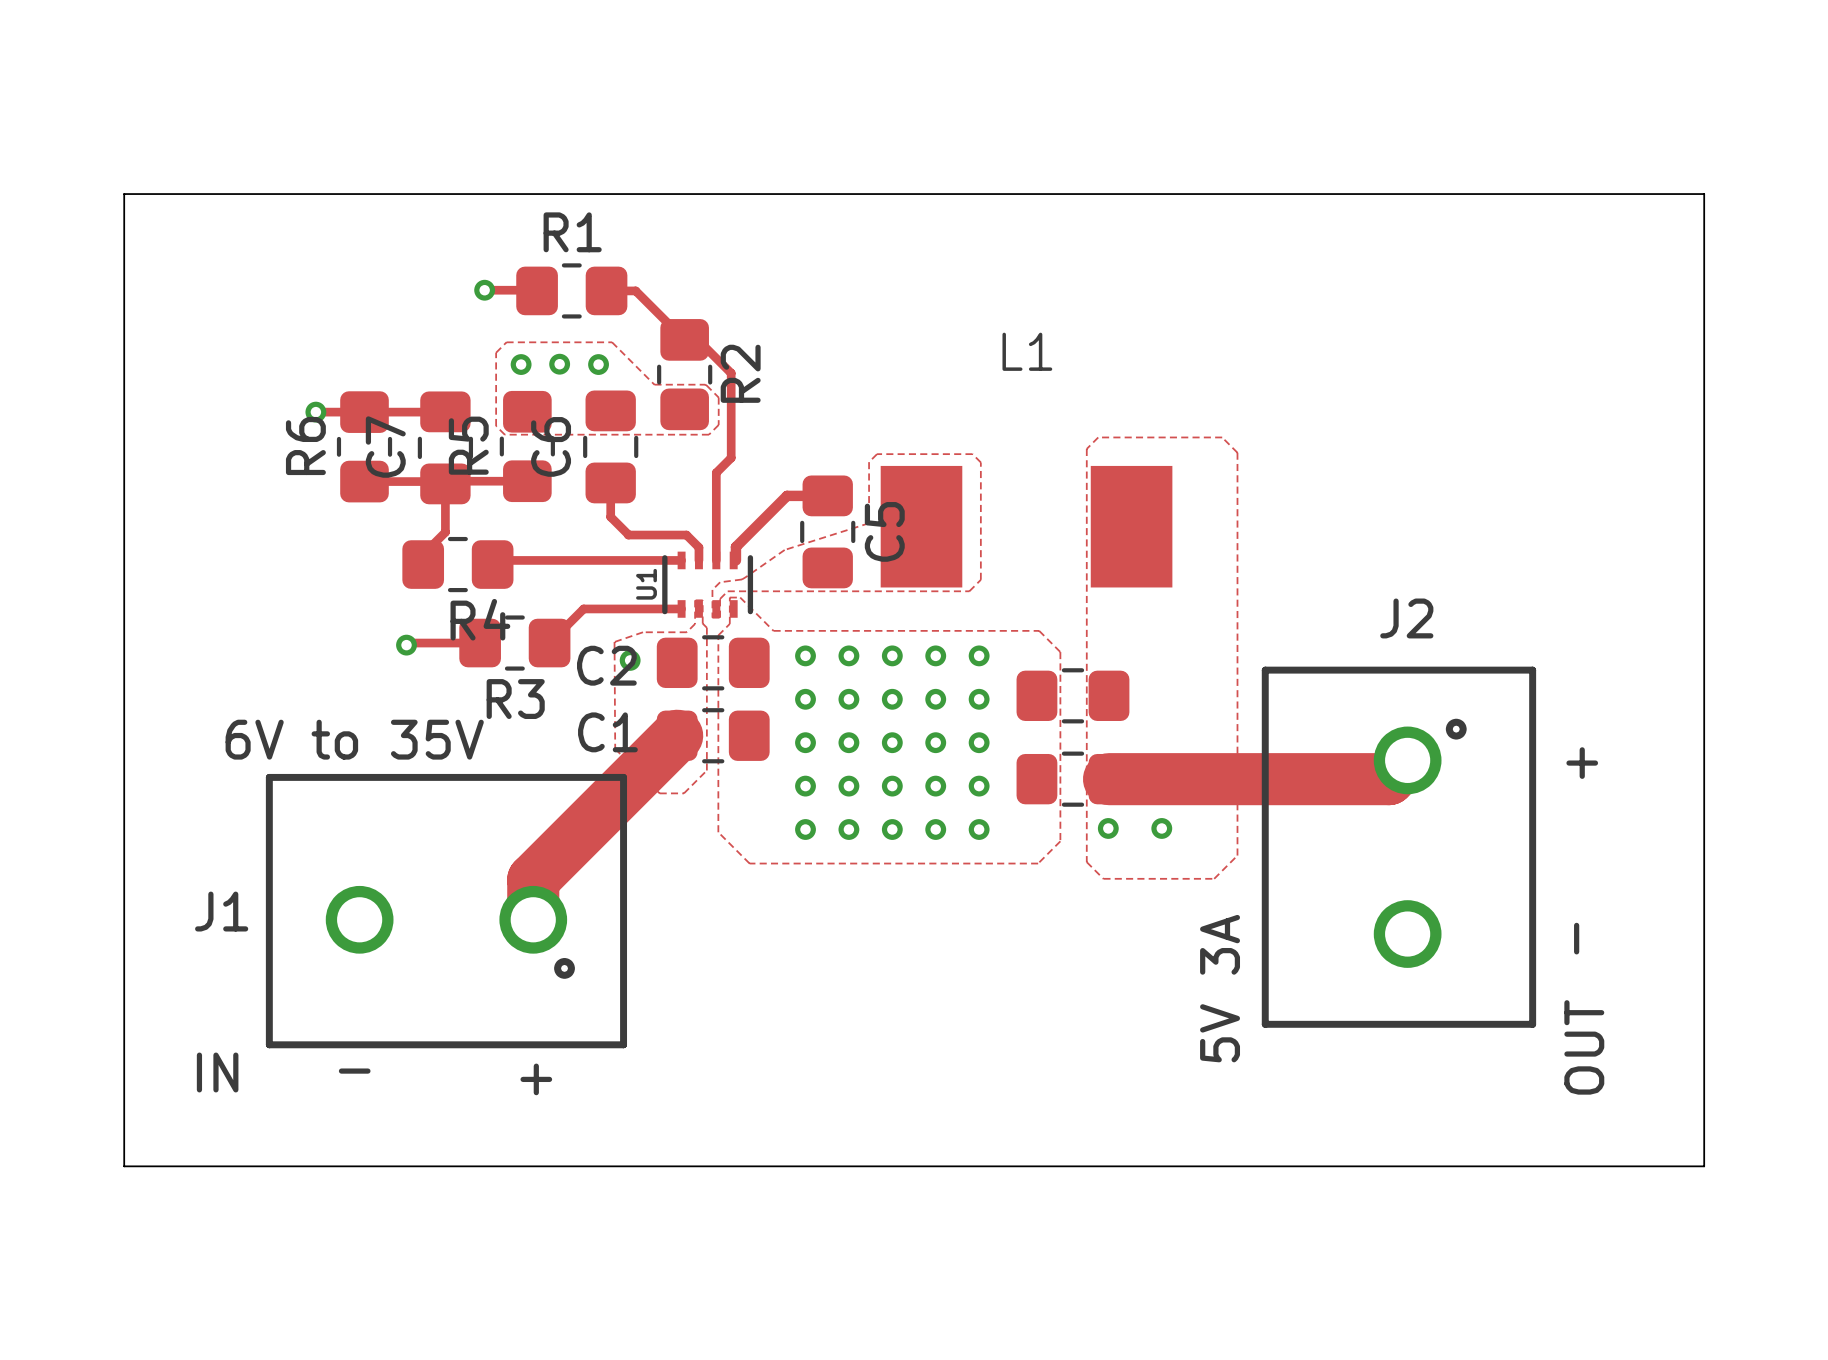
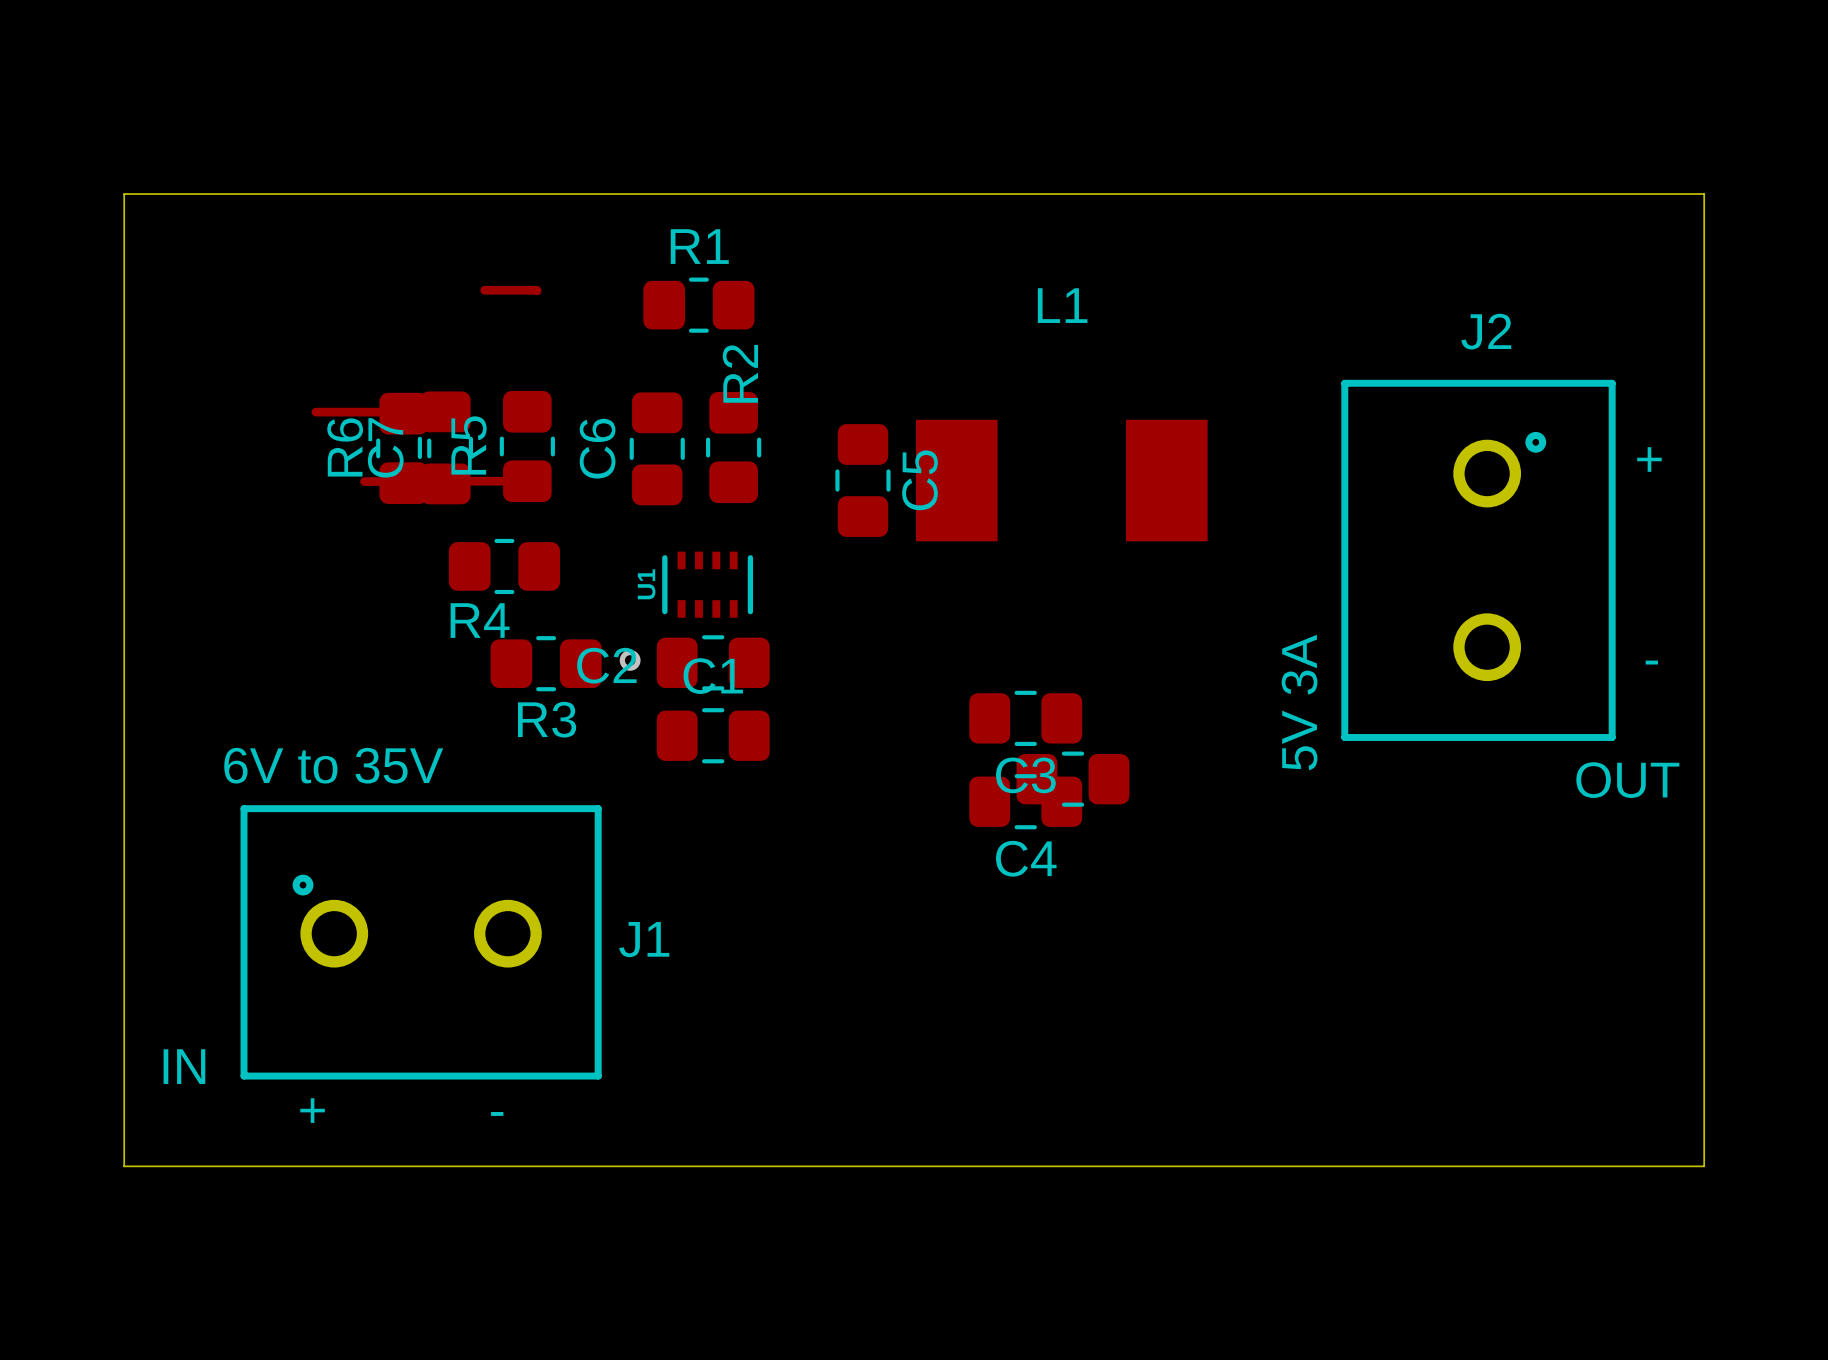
via: (484, 290) -> none
R1 position: (571, 290) -> (698, 305)
track: (606, 290) (635, 290) (684, 339) (697, 339) (731, 373) (731, 457) (716, 472) (716, 560) -> none
zone outline: (506, 342) (496, 352) (496, 426) (504, 434) (708, 434) (718, 424) (718, 397) (706, 385) (654, 384) (612, 342) (506, 342) -> none
via: (521, 364) -> none
via: (559, 364) -> none
via: (598, 364) -> none
R2 position: (684, 374) -> (733, 447)
via: (315, 412) -> none
zone outline: (1098, 437) (1086, 448) (1086, 862) (1103, 878) (1214, 878) (1237, 855) (1237, 452) (1222, 437) (1098, 437) -> none
R6 position: (364, 446) -> (403, 448)
C6 position: (610, 446) -> (657, 448)
zone outline: (877, 454) (972, 454) (980, 462) (980, 579) (969, 591) (727, 591) (720, 598) (720, 617) (712, 617) (712, 589) (720, 582) (741, 579) (784, 549) (869, 523) (869, 462) (877, 454) -> none
track: (610, 482) (610, 516) (628, 534) -> none
track: (445, 483) (445, 532) (423, 554) (423, 564) -> none
track: (827, 495) (787, 495) (735, 546) (735, 560) -> none
L1 position: (1026, 526) -> (1061, 480)
C5 position: (827, 531) -> (862, 480)
track: (628, 535) (686, 535) (698, 547) (698, 560) -> none
track: (681, 560) (496, 560) (492, 564) -> none
R4 position: (457, 564) -> (504, 566)
zone outline: (729, 597) (740, 597) (773, 630) (1039, 630) (1060, 652) (1060, 841) (1038, 863) (749, 863) (718, 832) (718, 635) (729, 623) (729, 597) -> none
zone outline: (695, 600) (702, 600) (702, 623) (706, 627) (706, 770) (683, 793) (659, 793) (615, 748) (614, 641) (642, 632) (686, 632) (695, 623) (695, 600) -> none
track: (681, 608) (583, 608) (549, 643) -> none
track: (480, 643) (408, 643) (406, 645) -> none
R3 position: (514, 643) -> (546, 663)
via: (406, 645) -> none
via: (805, 655) -> none
via: (848, 655) -> none
via: (892, 655) -> none
via: (935, 655) -> none
via: (979, 655) -> none
part: (1072, 695) -> none
via: (805, 699) -> none
via: (848, 699) -> none
via: (892, 699) -> none
via: (935, 699) -> none
via: (979, 699) -> none
C3: none -> (1025, 718)
C1 name position: C1 (607, 732) -> C1 (713, 676)
track: (677, 735) (533, 879) (533, 919) -> none
via: (805, 742) -> none
via: (848, 742) -> none
via: (892, 742) -> none
via: (935, 742) -> none
via: (979, 742) -> none
track: (1407, 760) (1388, 779) (1109, 779) -> none
text position: + (1582, 763) -> + (1649, 459)
via: (805, 786) -> none
via: (848, 786) -> none
via: (892, 786) -> none
via: (935, 786) -> none
via: (979, 786) -> none
C4: none -> (1025, 801)
via: (1108, 828) -> none
via: (1161, 828) -> none
via: (805, 829) -> none
via: (848, 829) -> none
via: (892, 829) -> none
via: (935, 829) -> none
via: (979, 829) -> none
J2 position: (1398, 847) -> (1478, 560)
J1 rotation: 0° (446, 911) -> 180° (421, 942)
text rotation: 0° (1576, 938) -> 90° clockwise (1651, 662)
text position: - (1576, 938) -> - (1651, 662)
text rotation: 0° (1584, 1047) -> 90° clockwise (1627, 780)
text position: OUT (1584, 1047) -> OUT (1627, 780)
text position: - (354, 1071) -> - (497, 1113)
text position: IN (217, 1072) -> IN (184, 1066)
text position: + (536, 1079) -> + (312, 1110)

